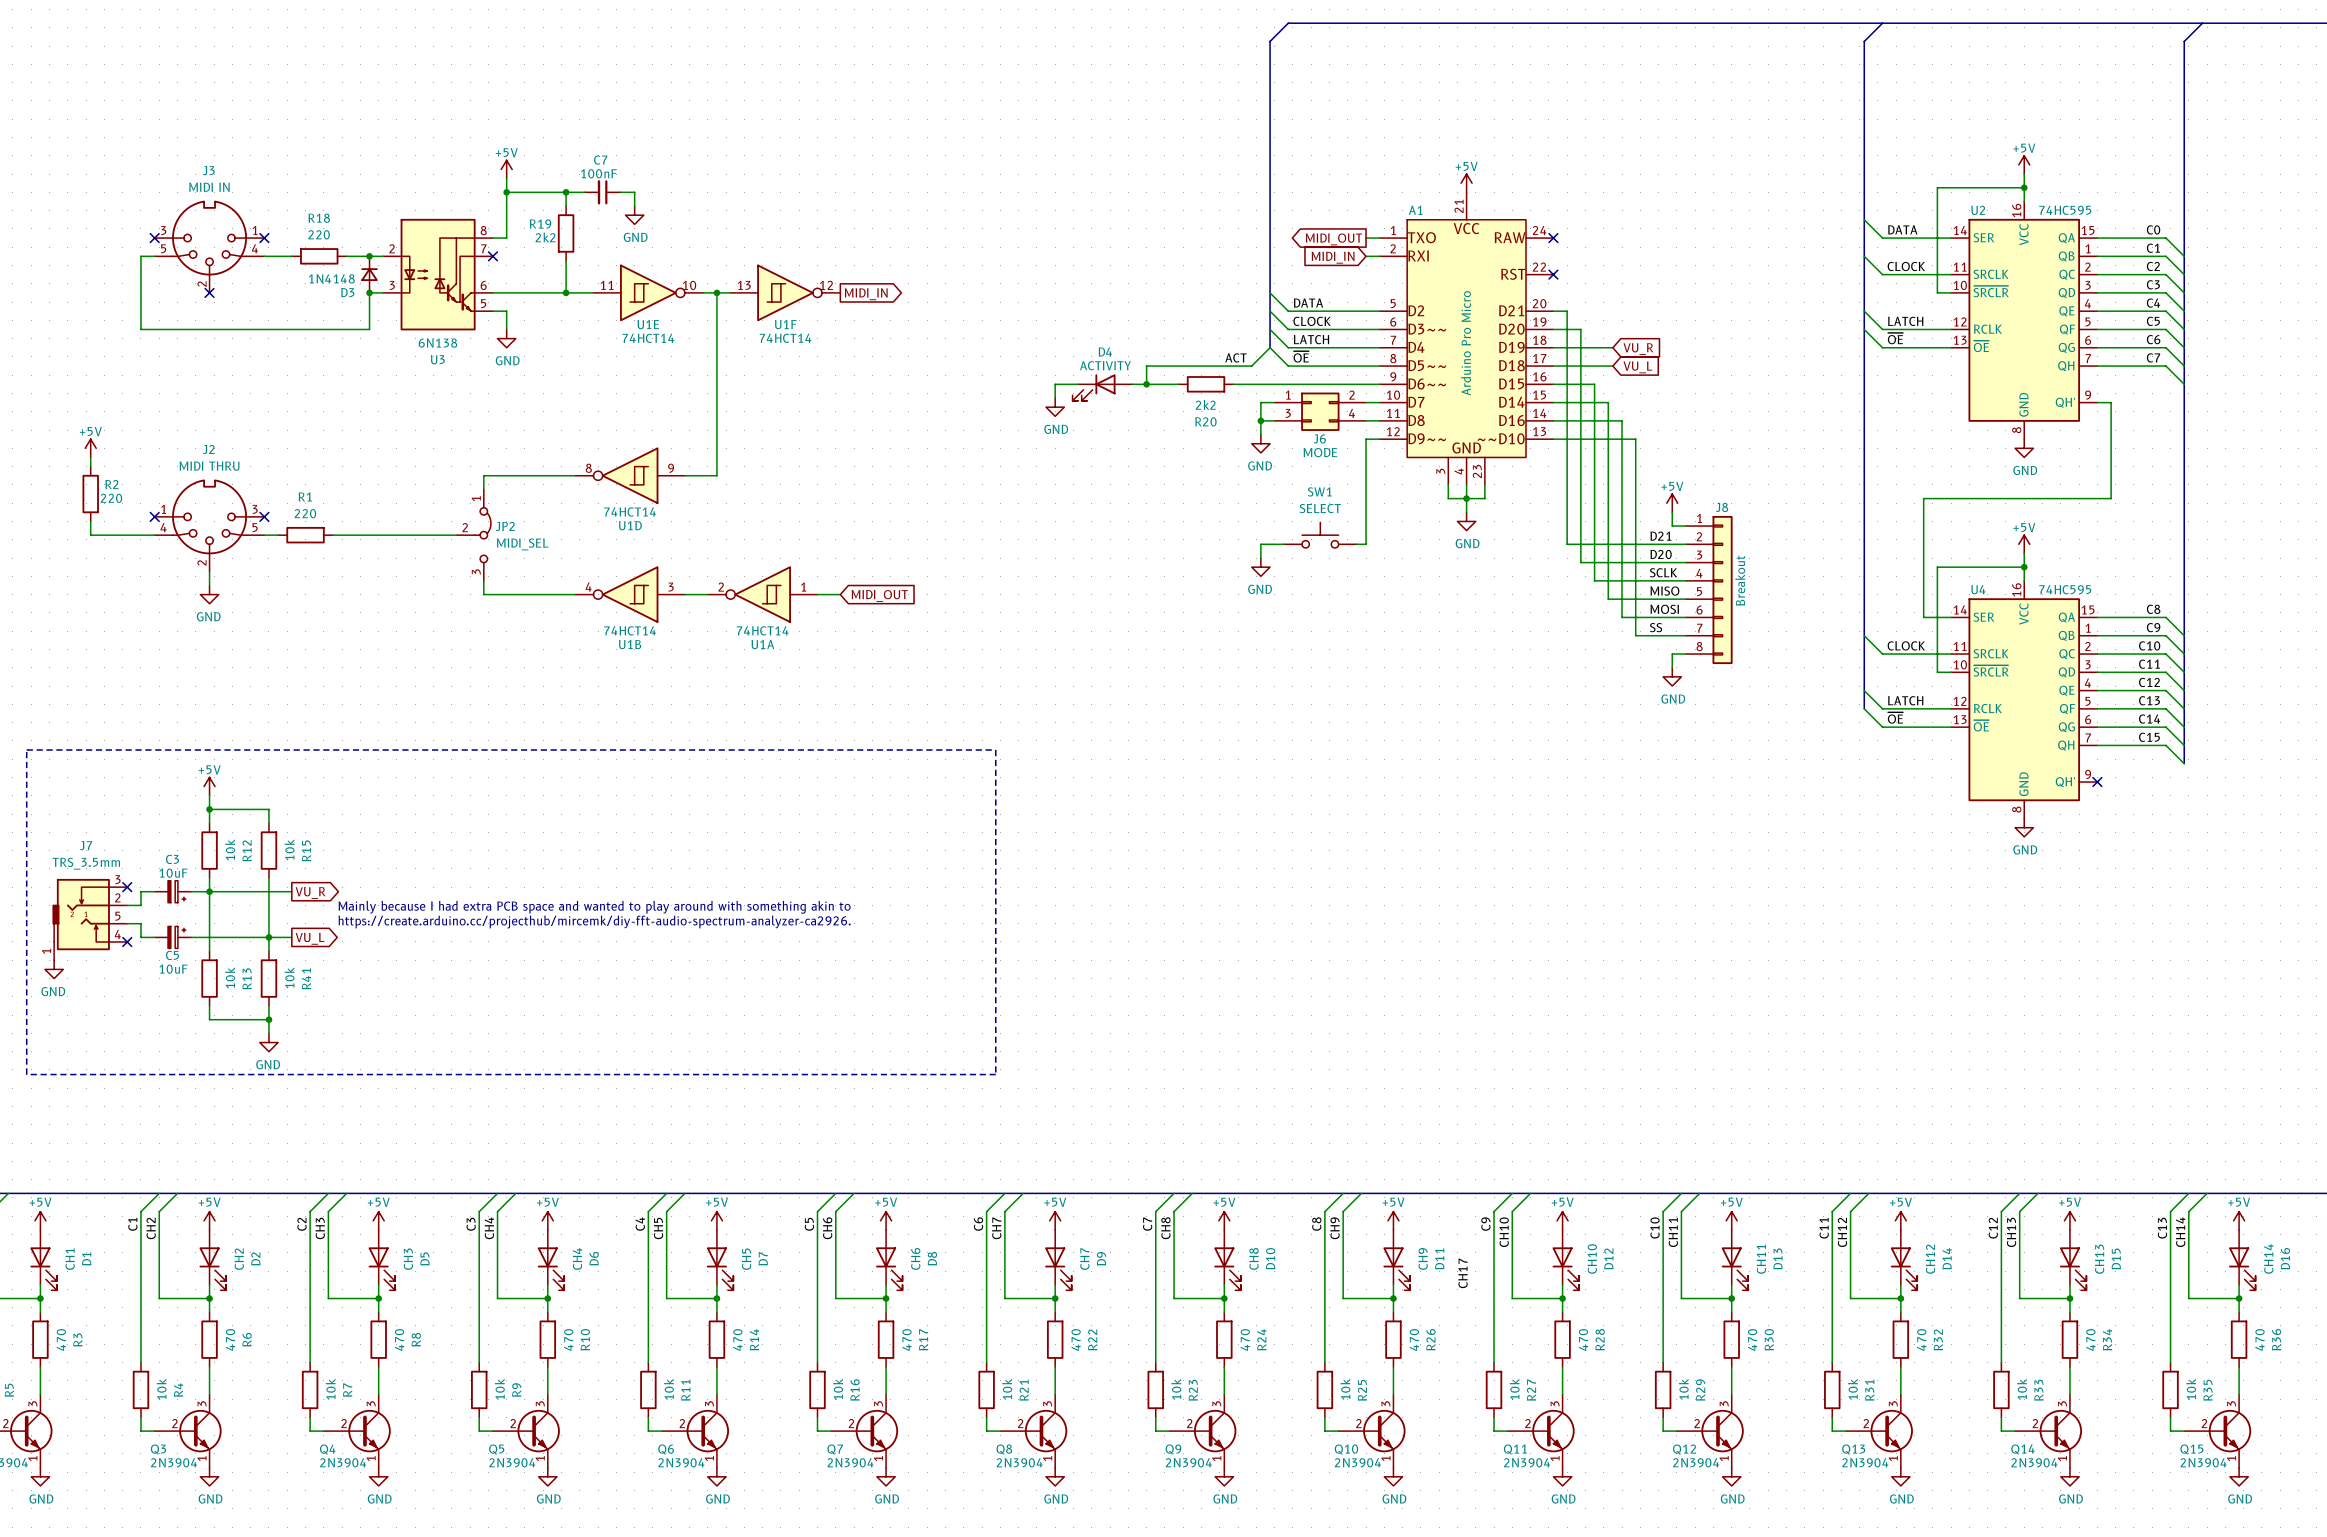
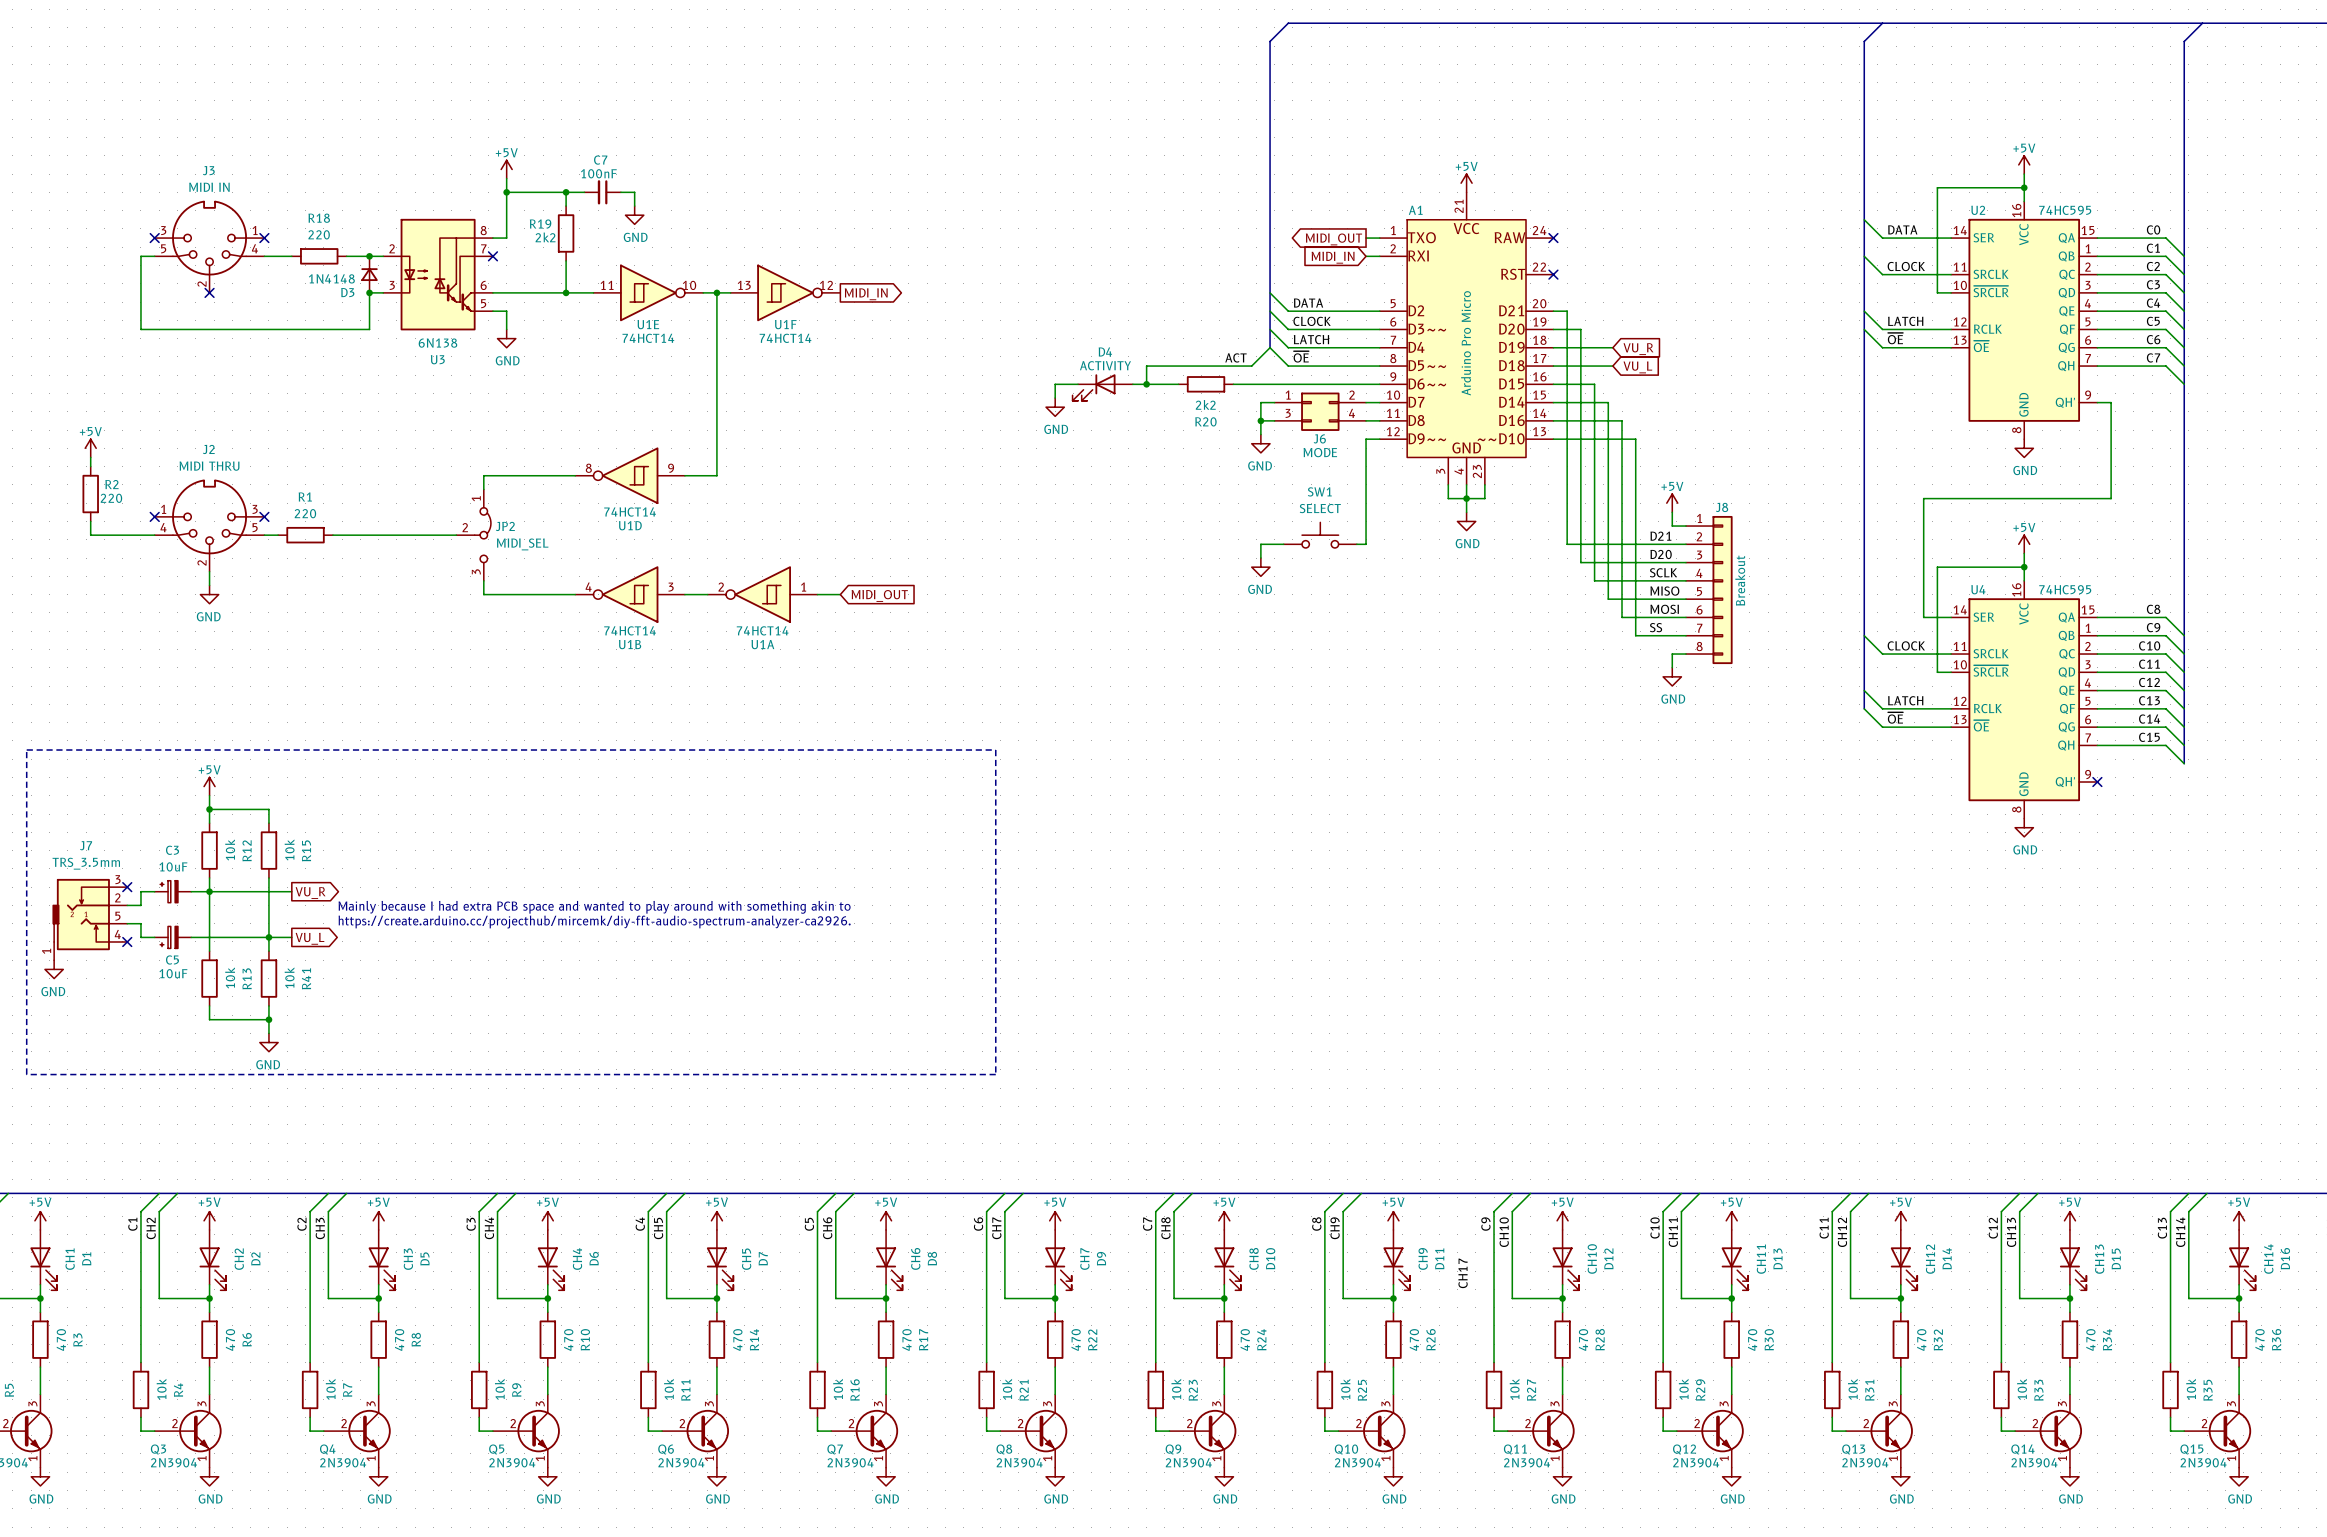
C3 rotation: 0° (176, 891) -> 180° (169, 891)
C5 rotation: 0° (176, 937) -> 180° (169, 937)

